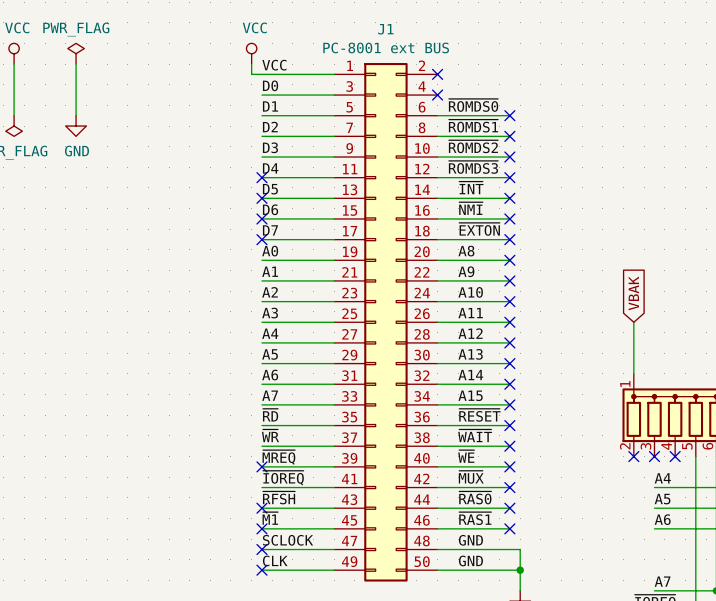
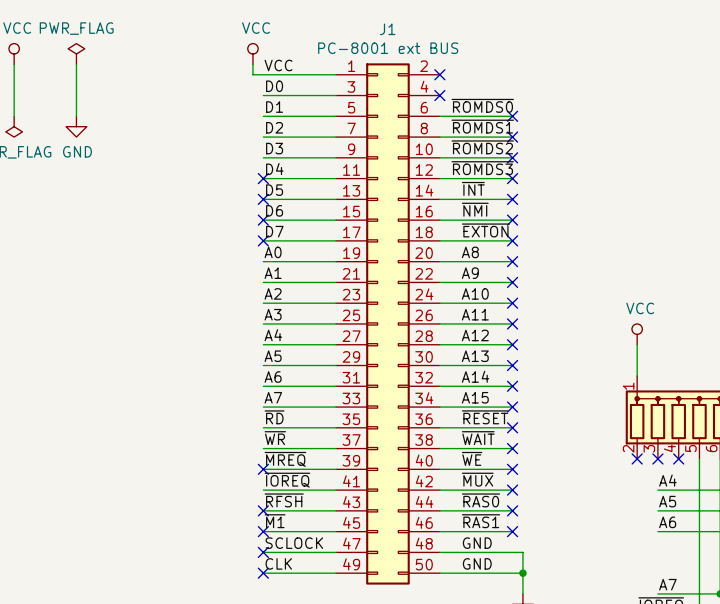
global label: VBAK (633, 293) -> none
power symbol: none -> VCC (637, 334)

